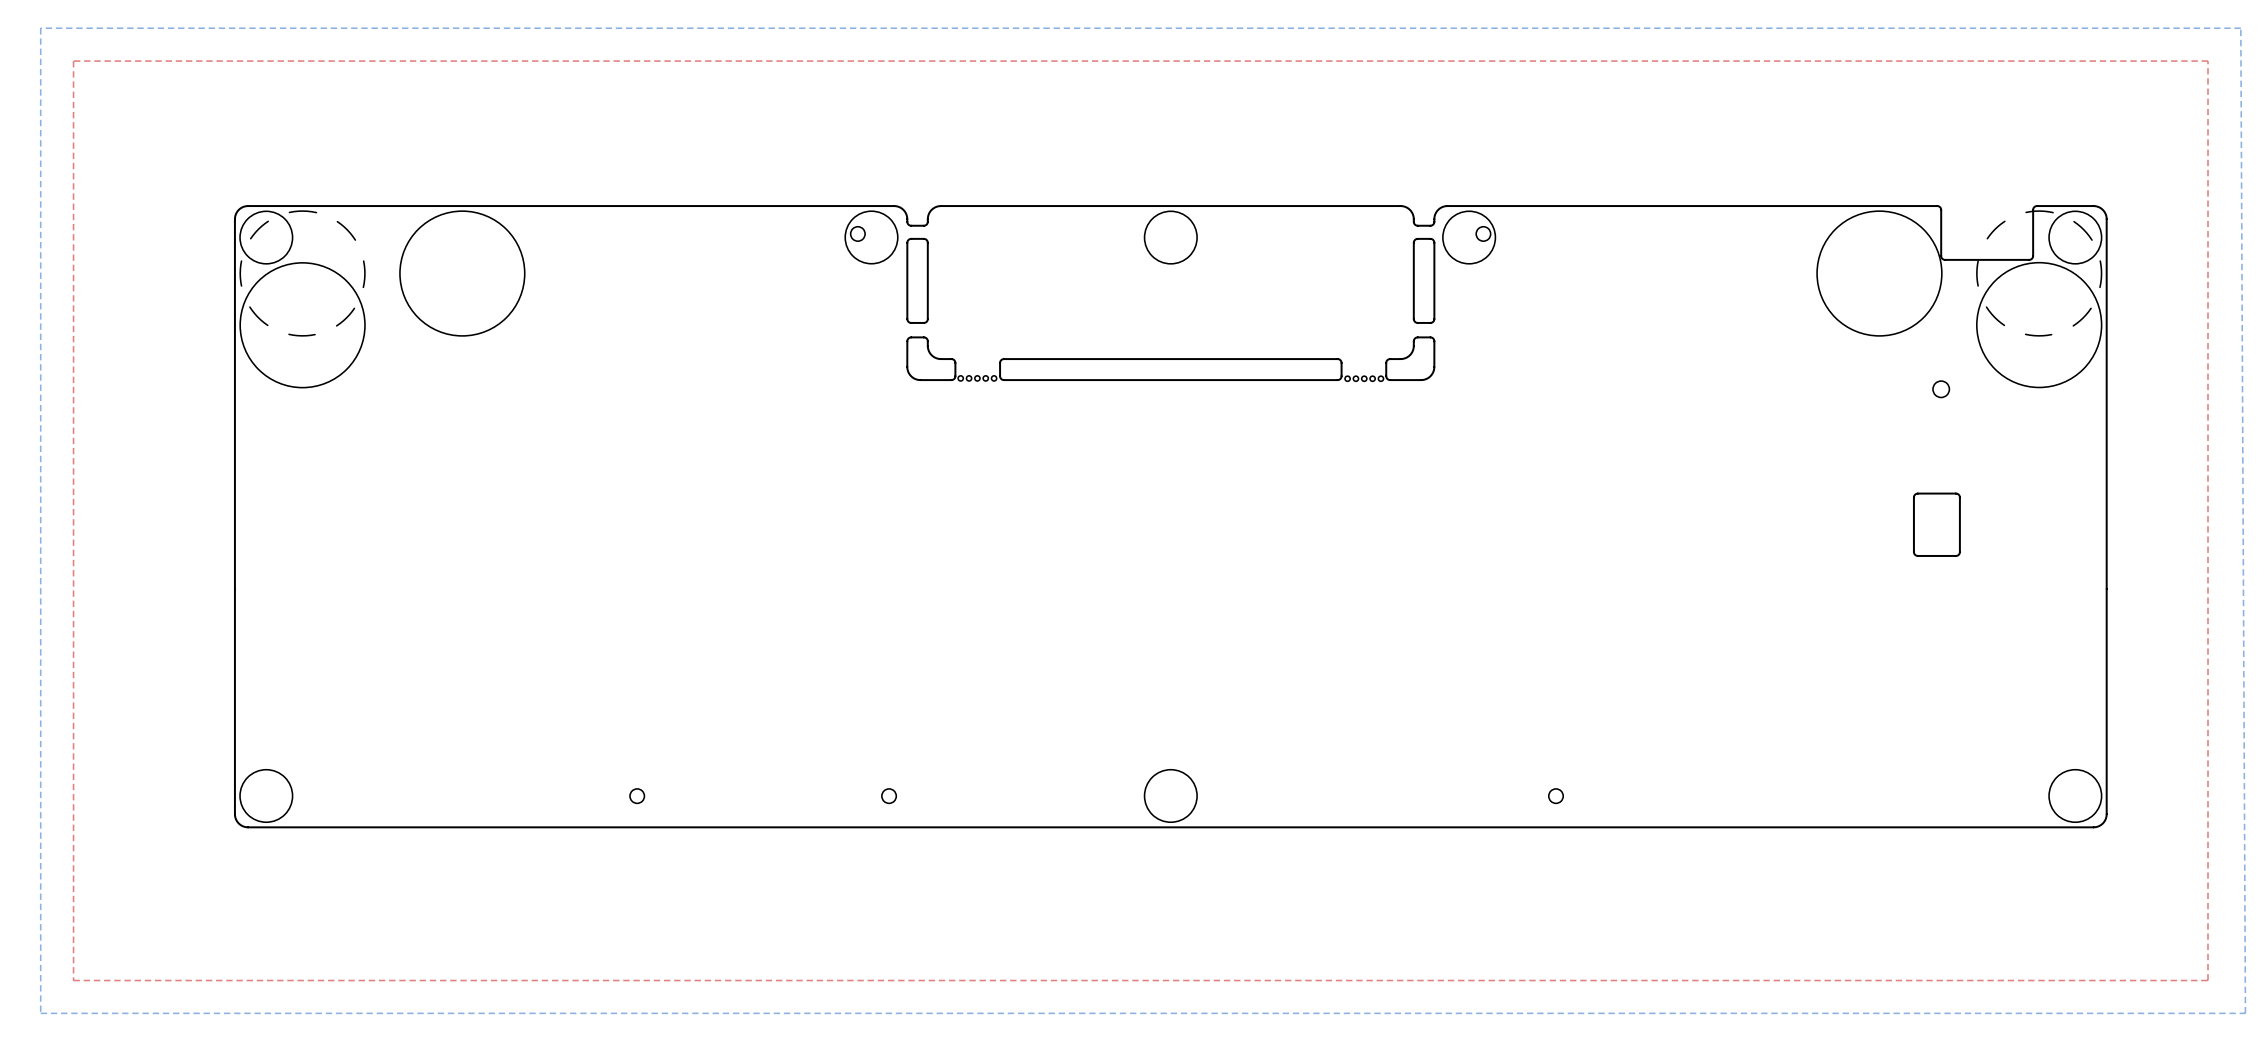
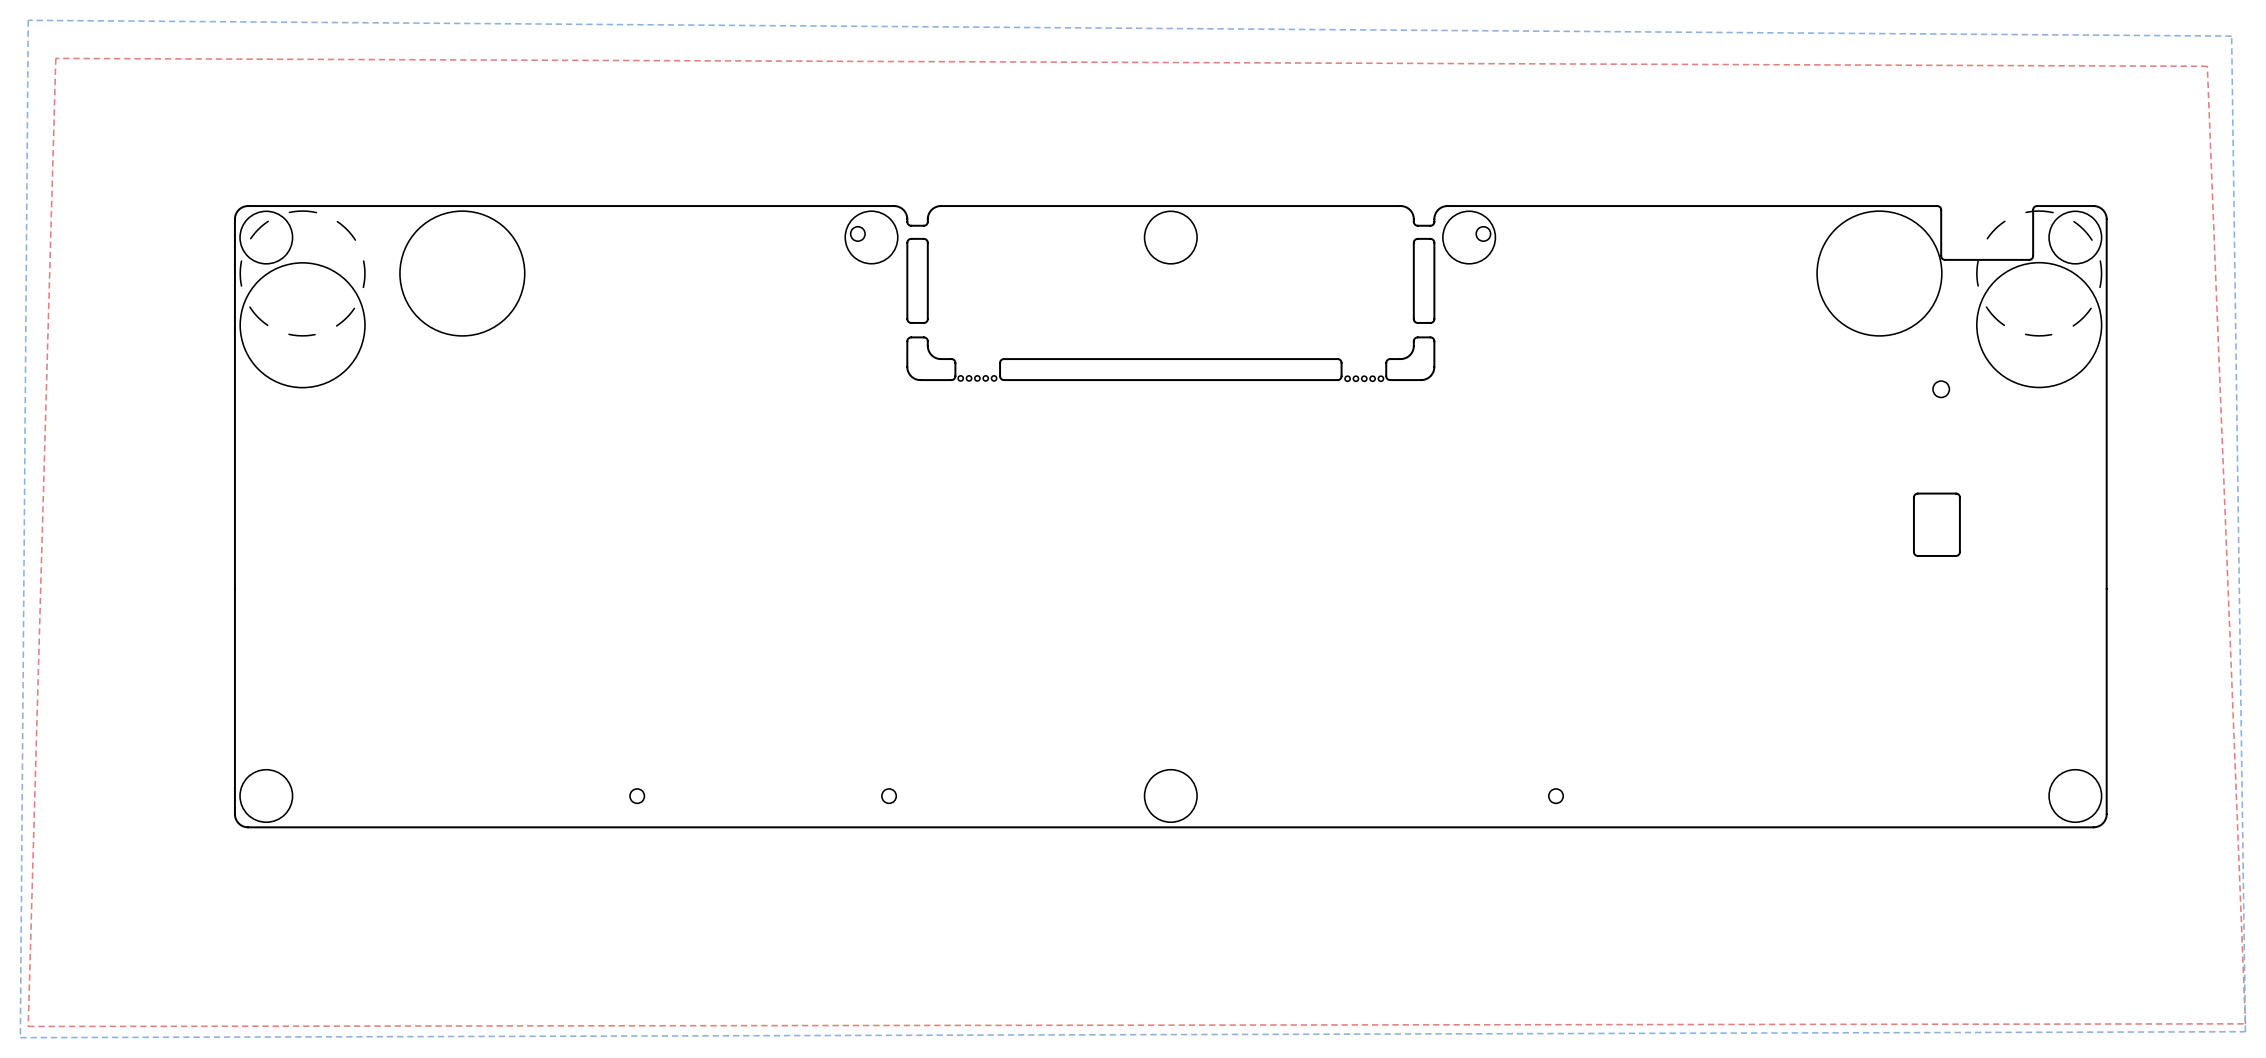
bottom zone outline: (2240, 28) (2245, 1013) (40, 1013) (40, 28) (2240, 28) -> (28, 20) (2231, 36) (2245, 1031) (20, 1037) (28, 20)
top zone outline: (2208, 61) (2208, 980) (73, 980) (73, 61) (2208, 61) -> (55, 58) (2207, 66) (2245, 1023) (28, 1026) (55, 58)

